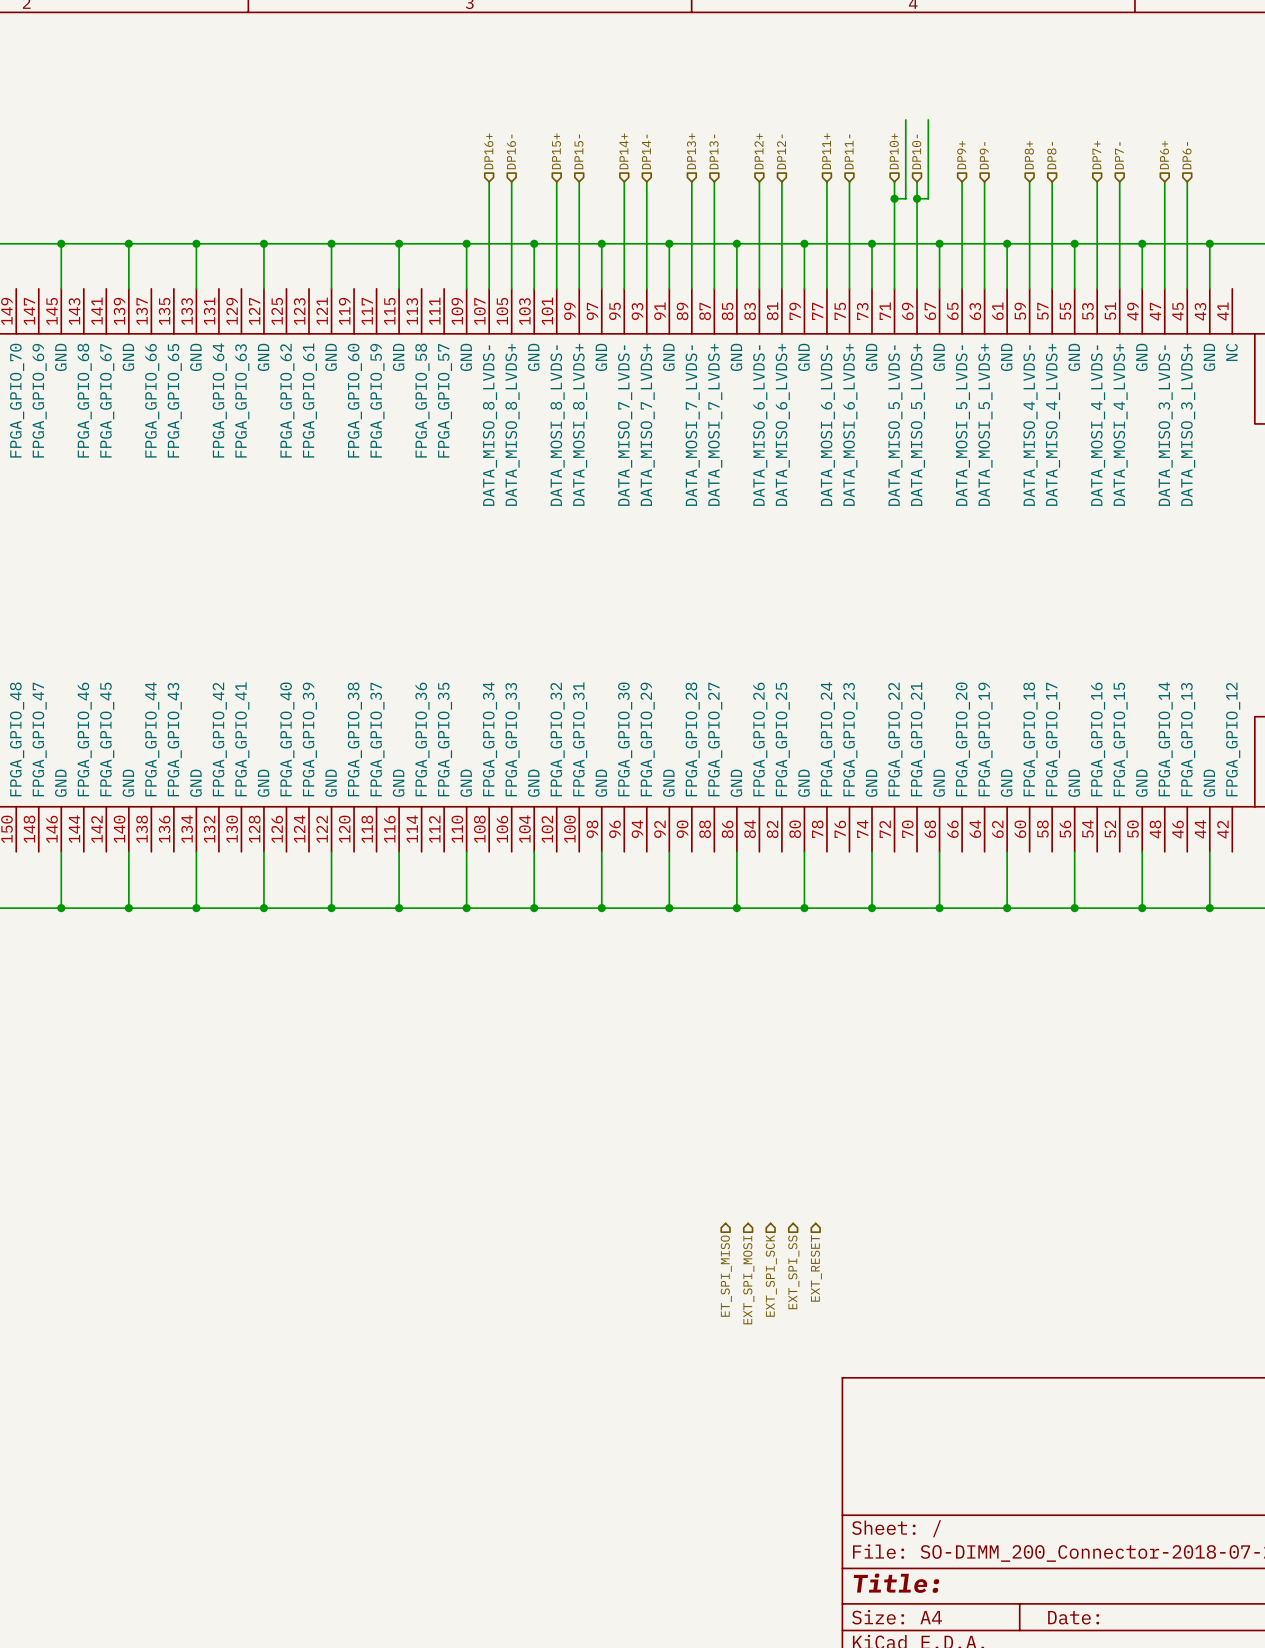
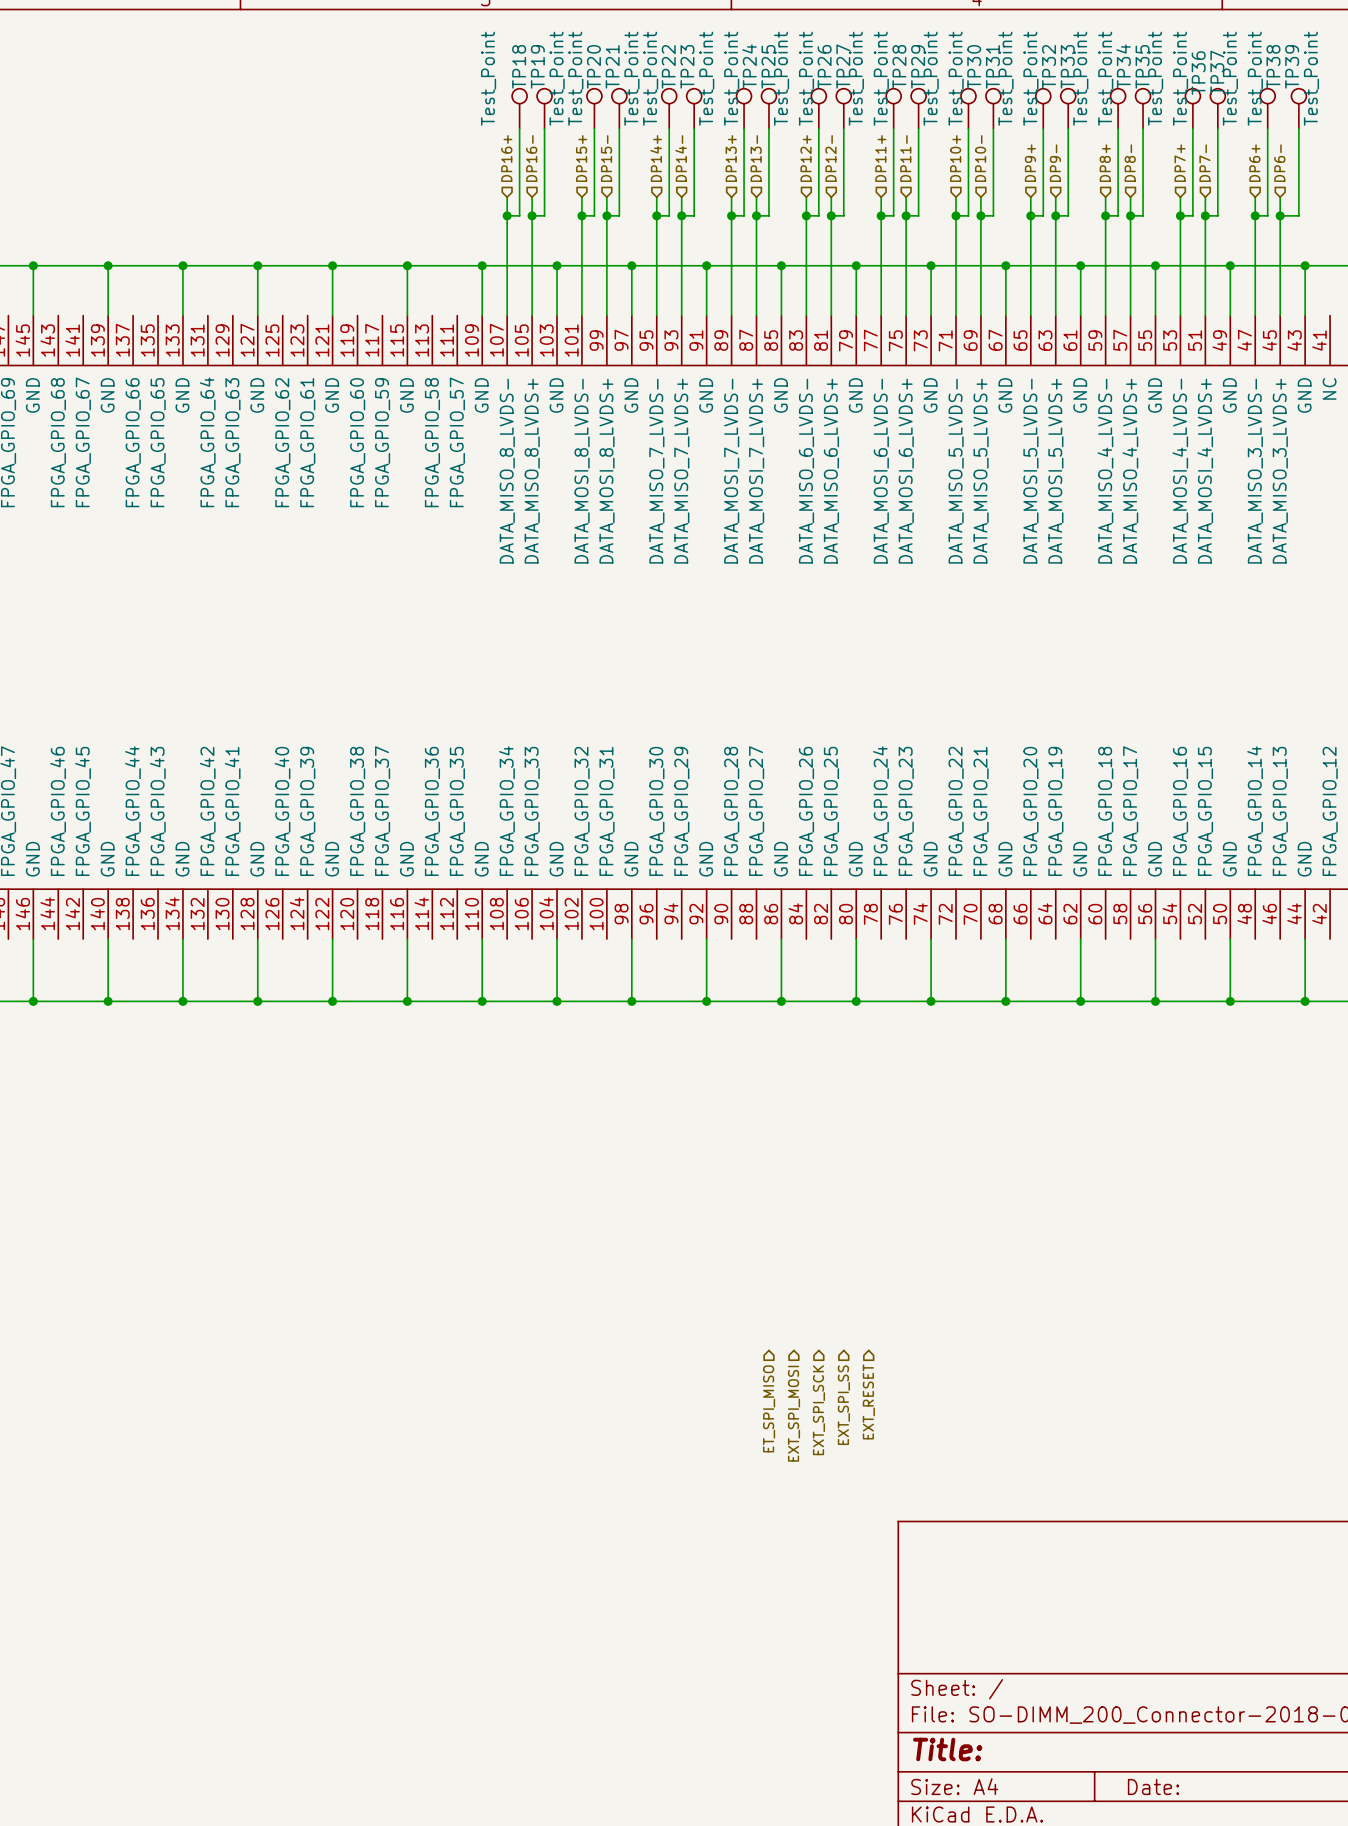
TP18: none -> Test_Point (519, 108)
TP19: none -> Test_Point (544, 108)
TP20: none -> Test_Point (594, 108)
TP21: none -> Test_Point (619, 108)
TP22: none -> Test_Point (669, 108)
TP23: none -> Test_Point (694, 108)
TP24: none -> Test_Point (744, 108)
TP25: none -> Test_Point (768, 108)
TP26: none -> Test_Point (818, 108)
TP27: none -> Test_Point (843, 108)
TP28: none -> Test_Point (893, 108)
TP29: none -> Test_Point (918, 108)
TP30: none -> Test_Point (968, 108)
TP31: none -> Test_Point (993, 108)
TP32: none -> Test_Point (1043, 108)
TP33: none -> Test_Point (1068, 108)
TP34: none -> Test_Point (1118, 108)
TP35: none -> Test_Point (1143, 108)
TP36: none -> Test_Point (1192, 108)
TP37: none -> Test_Point (1217, 108)
TP38: none -> Test_Point (1267, 108)
TP39: none -> Test_Point (1298, 108)
wire: none -> (519, 128) (519, 215) (507, 215)
wire: none -> (544, 128) (544, 215) (532, 215)
wire: none -> (594, 128) (594, 215) (581, 215)
wire: none -> (619, 128) (619, 215) (606, 215)
wire: none -> (669, 128) (669, 215) (656, 215)
wire: none -> (694, 128) (694, 215) (681, 215)
wire: none -> (744, 128) (744, 215) (731, 215)
wire: none -> (768, 128) (768, 215) (756, 215)
wire: none -> (818, 128) (818, 215) (806, 215)
wire: none -> (843, 128) (843, 215) (831, 215)
wire: none -> (893, 128) (893, 215) (881, 215)
wire: none -> (918, 128) (918, 215) (906, 215)
wire: none -> (1043, 128) (1043, 215) (1030, 215)
wire: none -> (1068, 128) (1068, 215) (1055, 215)
wire: none -> (1118, 128) (1118, 215) (1105, 215)
wire: none -> (1143, 128) (1143, 215) (1130, 215)
wire: none -> (1192, 128) (1192, 215) (1180, 215)
wire: none -> (1217, 128) (1217, 215) (1205, 215)
wire: none -> (1267, 128) (1267, 215) (1255, 215)
wire: none -> (1298, 128) (1298, 215) (1280, 215)
junction: none -> (507, 215)
junction: none -> (532, 215)
junction: none -> (581, 215)
junction: none -> (606, 215)
junction: none -> (656, 215)
junction: none -> (681, 215)
junction: none -> (731, 215)
junction: none -> (756, 215)
junction: none -> (806, 215)
junction: none -> (831, 215)
junction: none -> (881, 215)
junction: none -> (906, 215)
junction: none -> (1030, 215)
junction: none -> (1055, 215)
junction: none -> (1105, 215)
junction: none -> (1130, 215)
junction: none -> (1180, 215)
junction: none -> (1205, 215)
junction: none -> (1255, 215)
junction: none -> (1280, 215)

